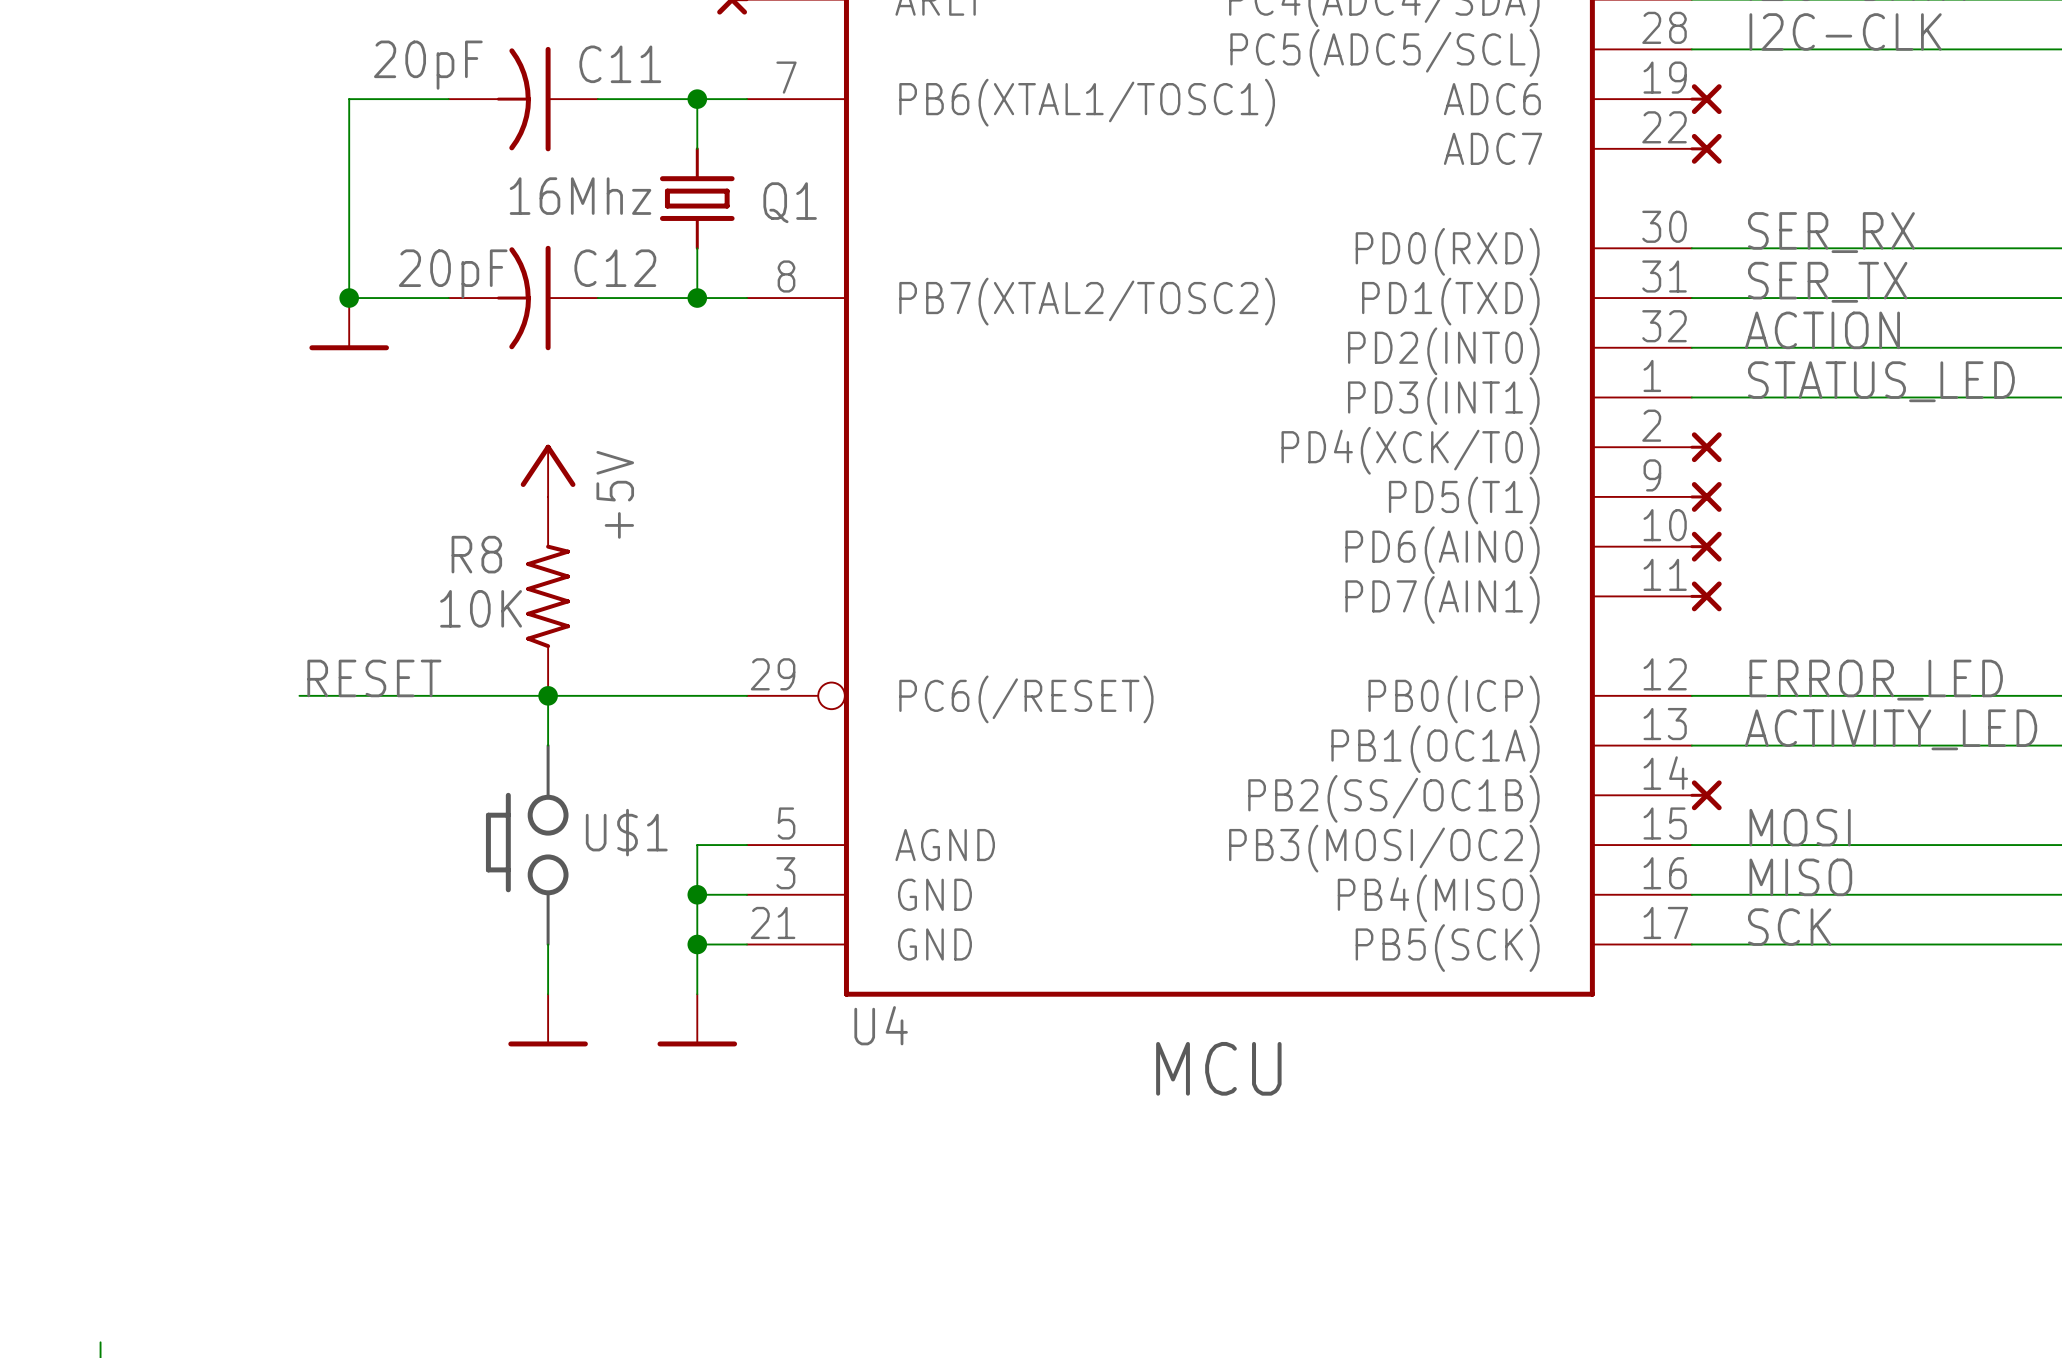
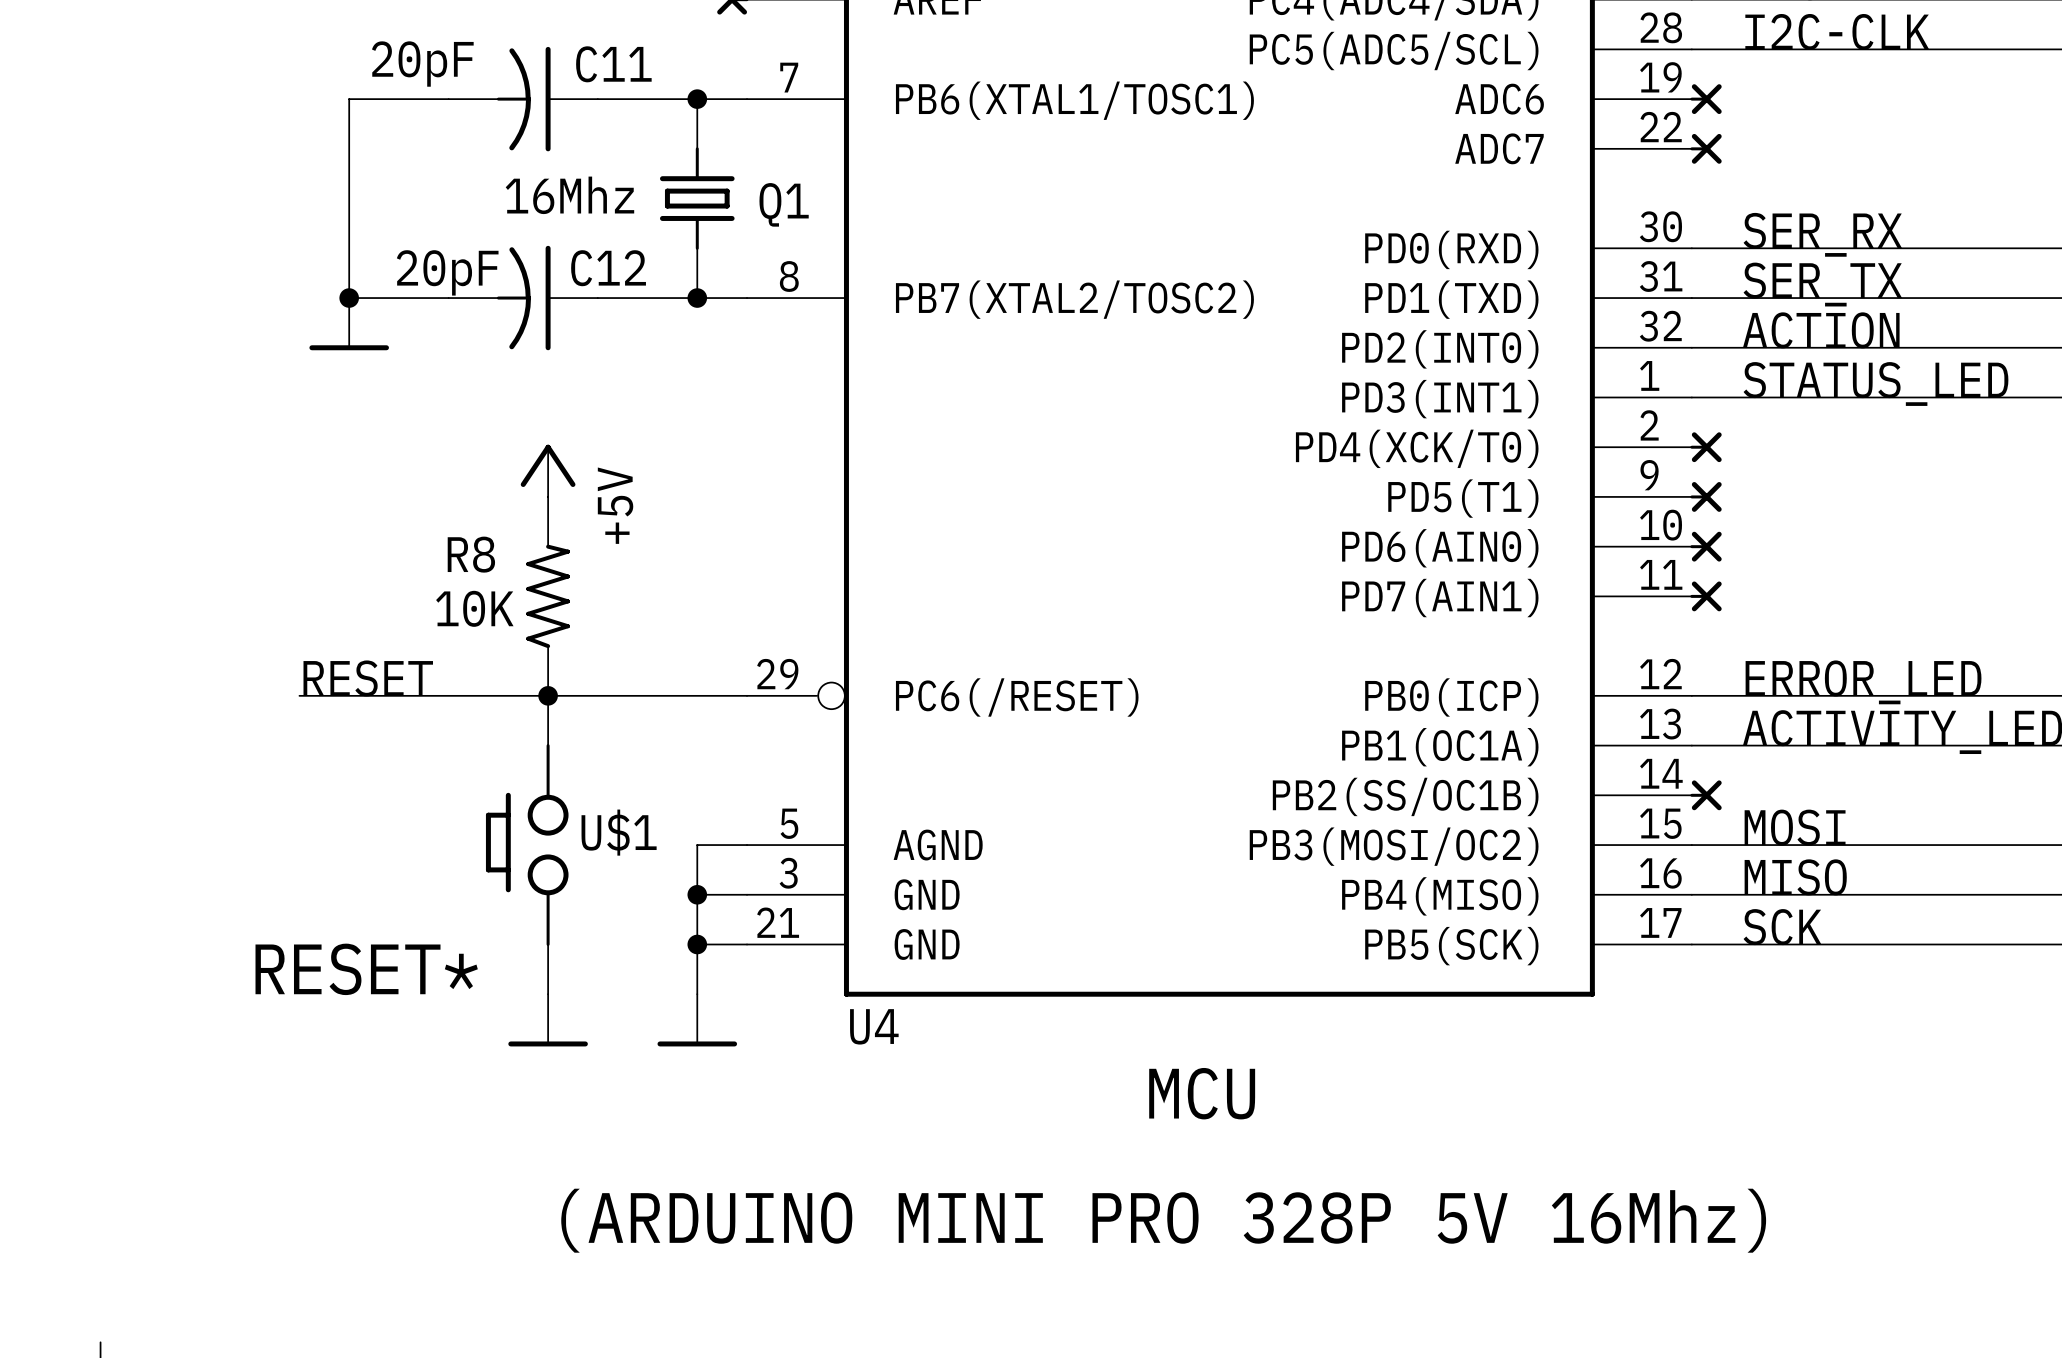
text: none -> RESET* (366, 969)
text position: MCU (1218, 1068) -> MCU (1202, 1093)
text: none -> (ARDUINO MINI PRO 328P 5V 16Mhz) (1163, 1220)

